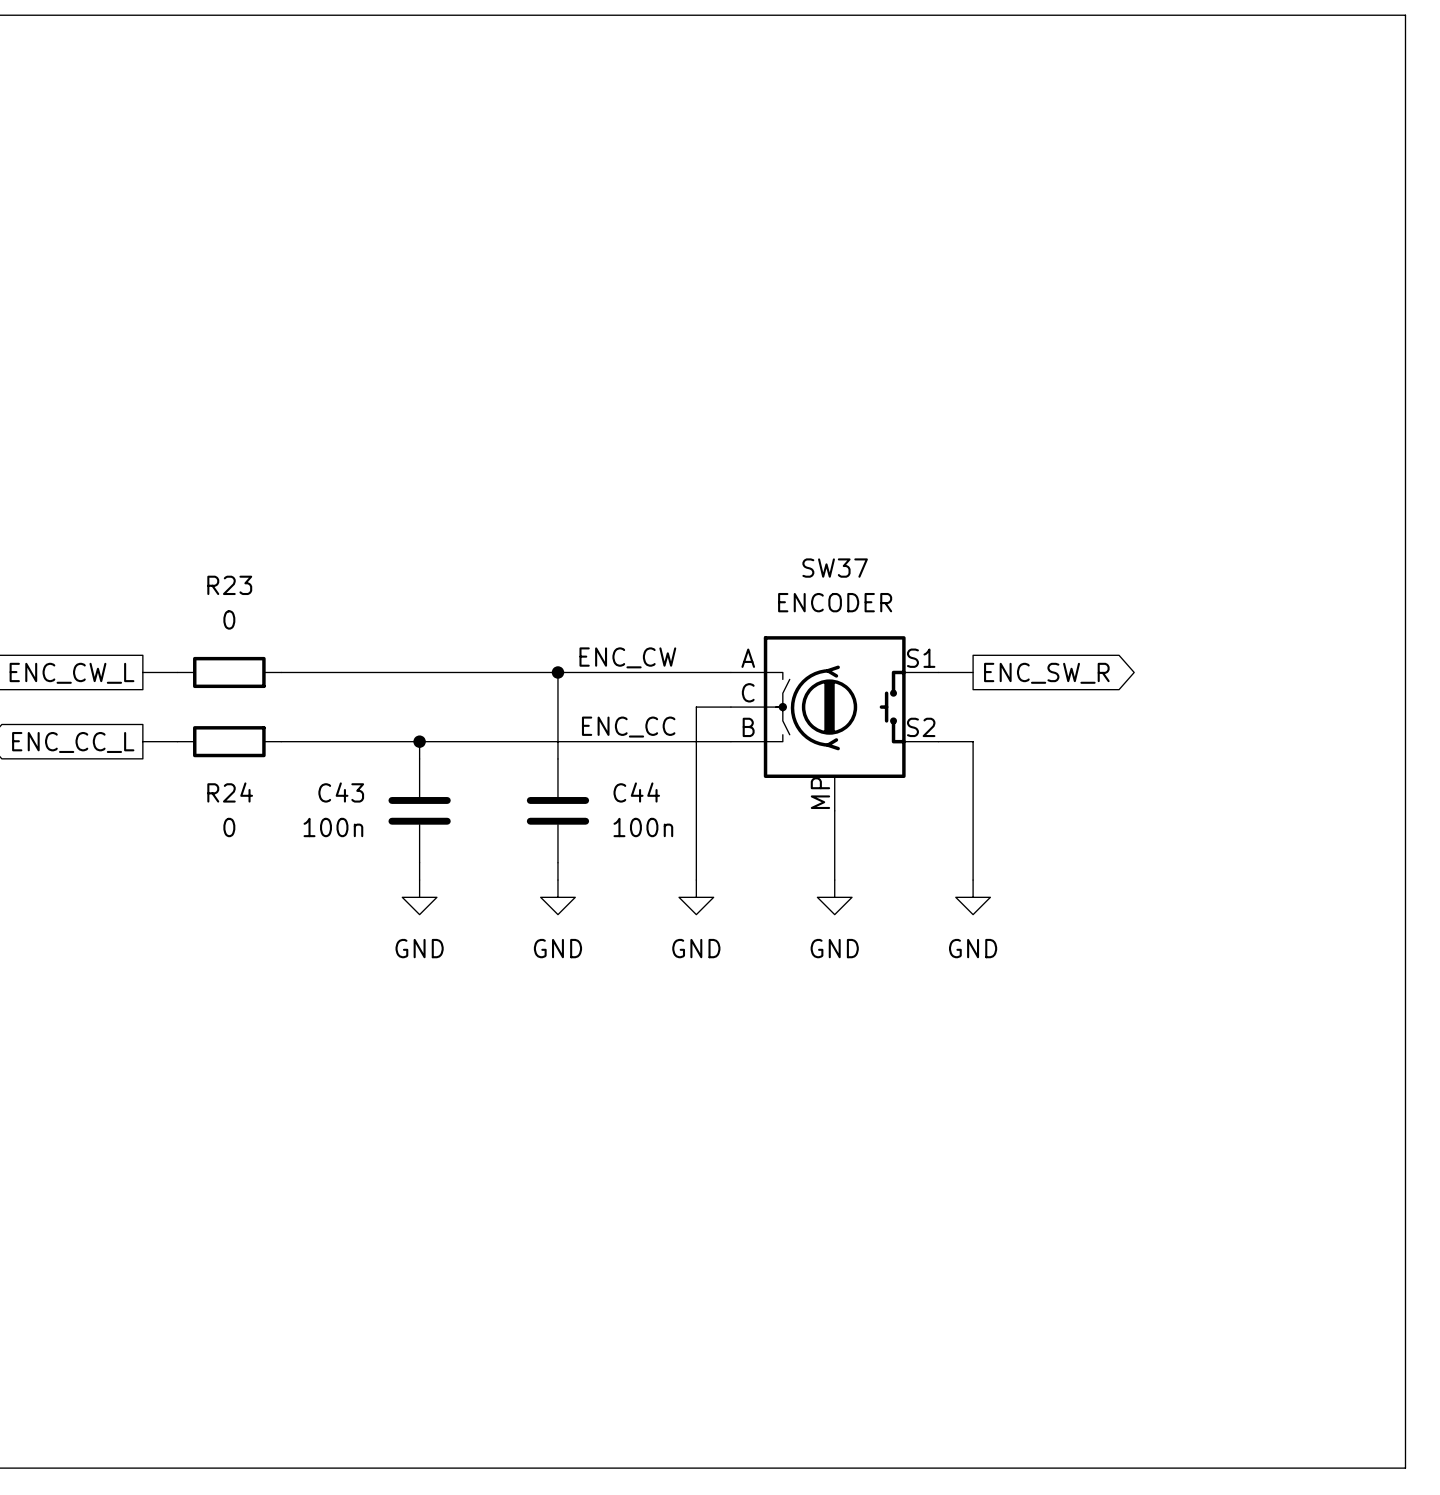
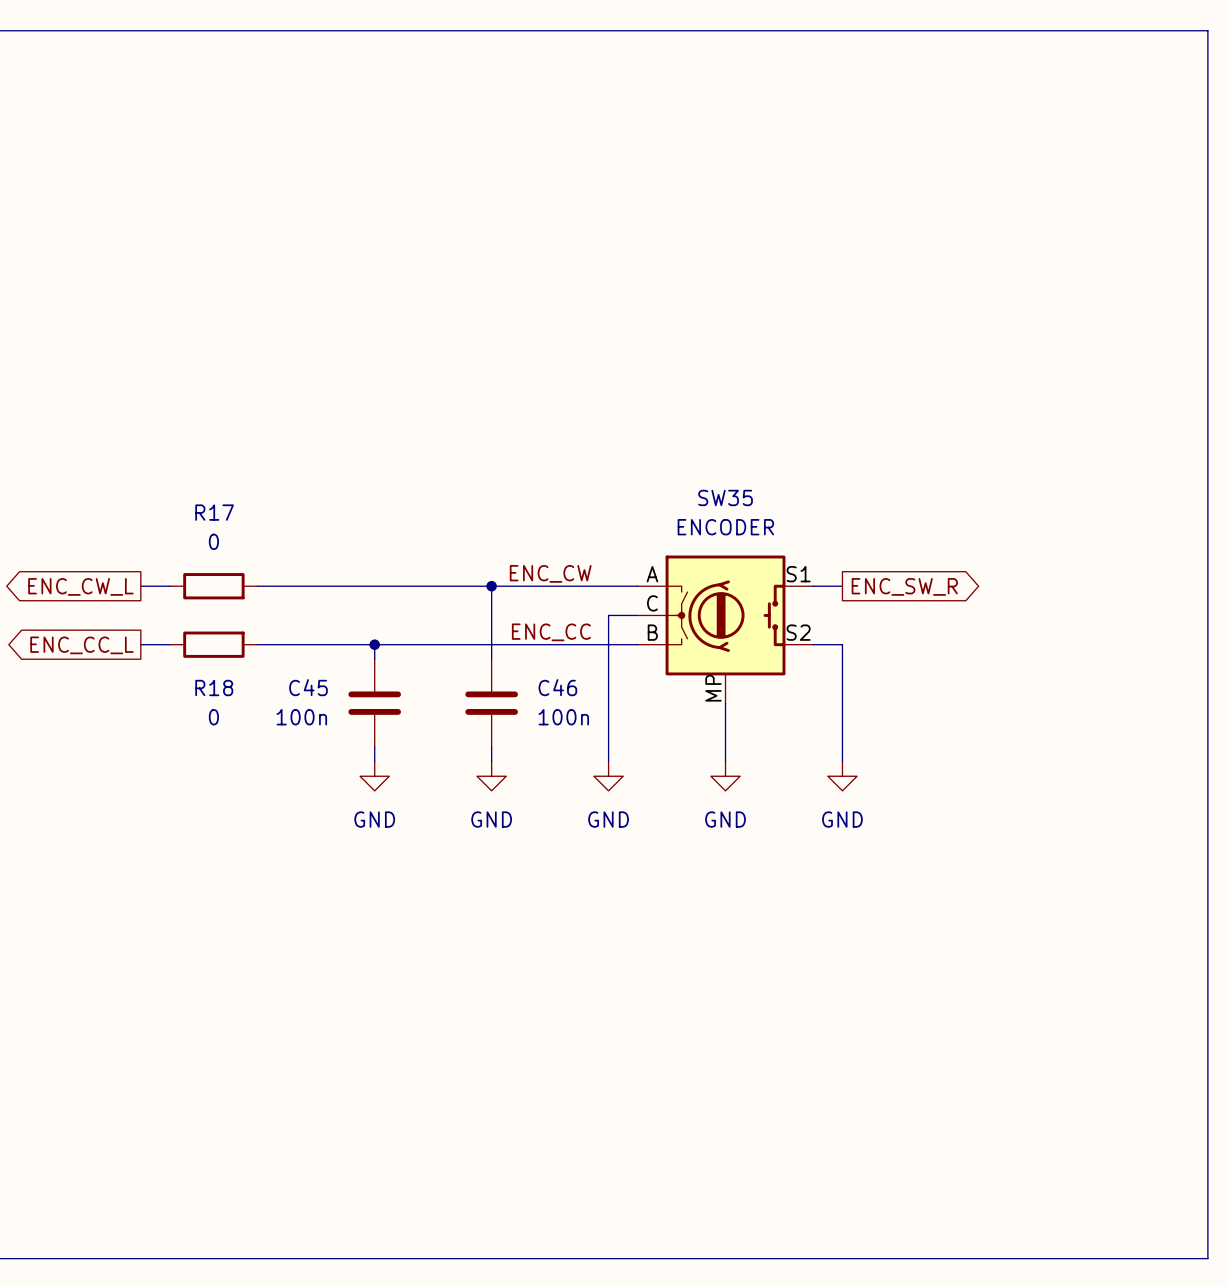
SW37 name: SW37 (835, 568) -> SW35 (725, 497)
R23 name: R23 (229, 585) -> R17 (214, 512)
R24 name: R24 (230, 792) -> R18 (214, 688)
C43 name: C43 (341, 792) -> C45 (308, 687)
C44 name: C44 (636, 792) -> C46 (557, 687)

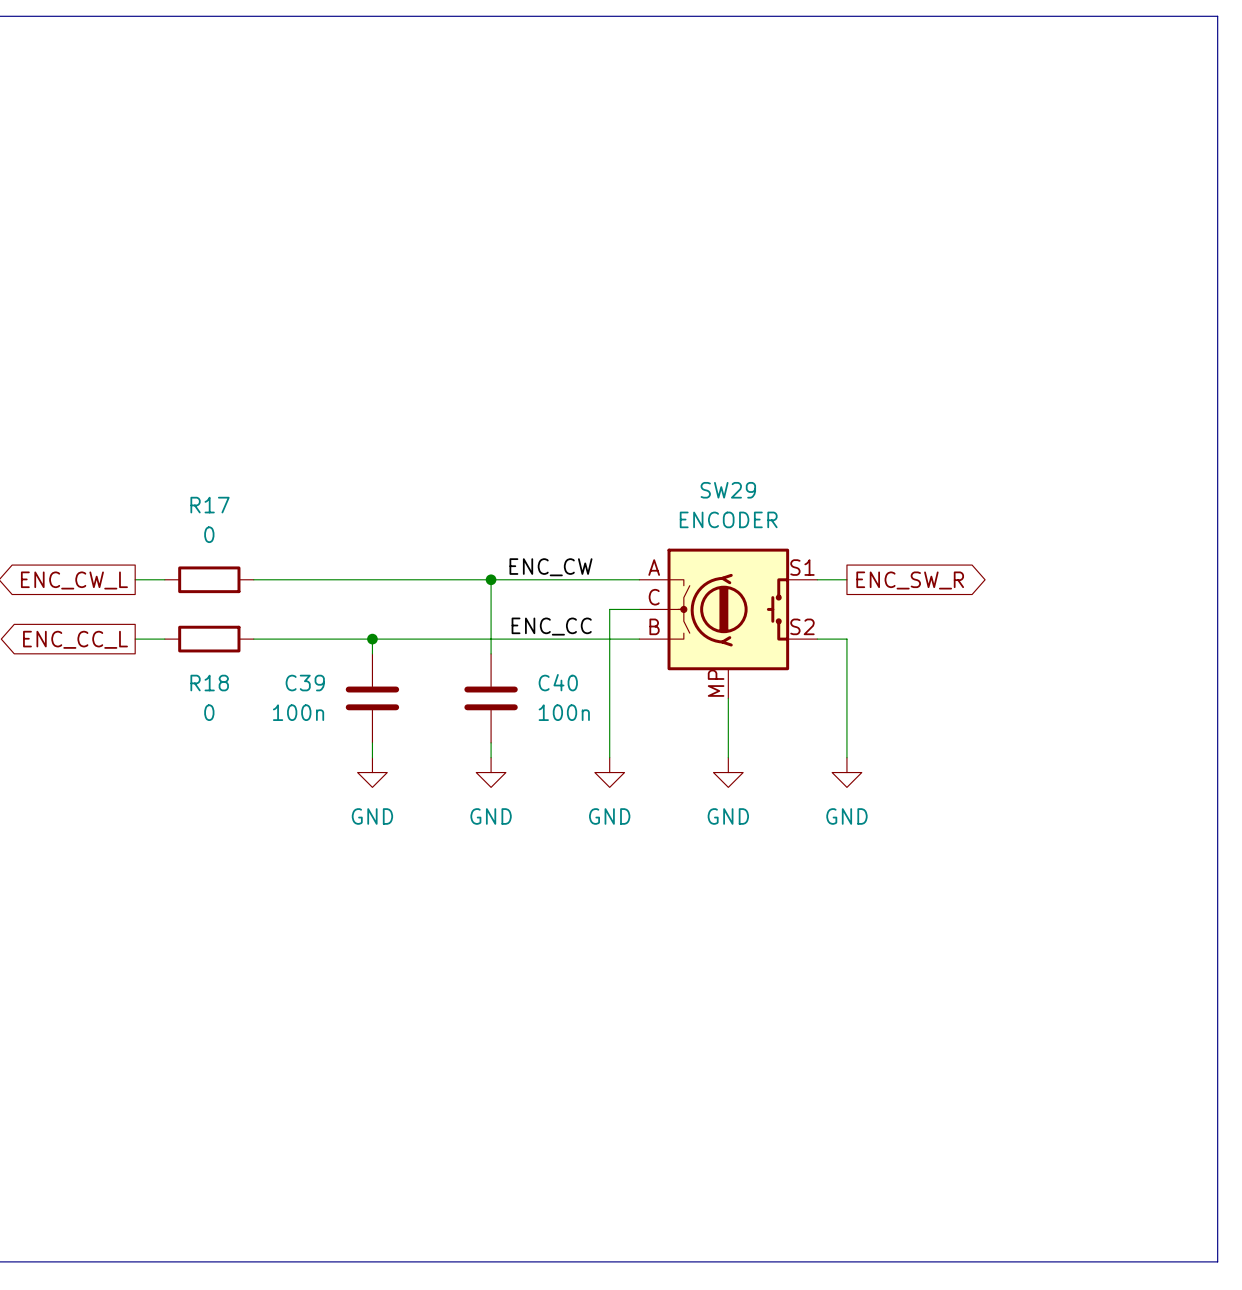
SW35 name: SW35 (725, 497) -> SW29 (728, 490)
C45 name: C45 (308, 687) -> C39 (305, 683)
C46 name: C46 (557, 687) -> C40 (558, 682)

